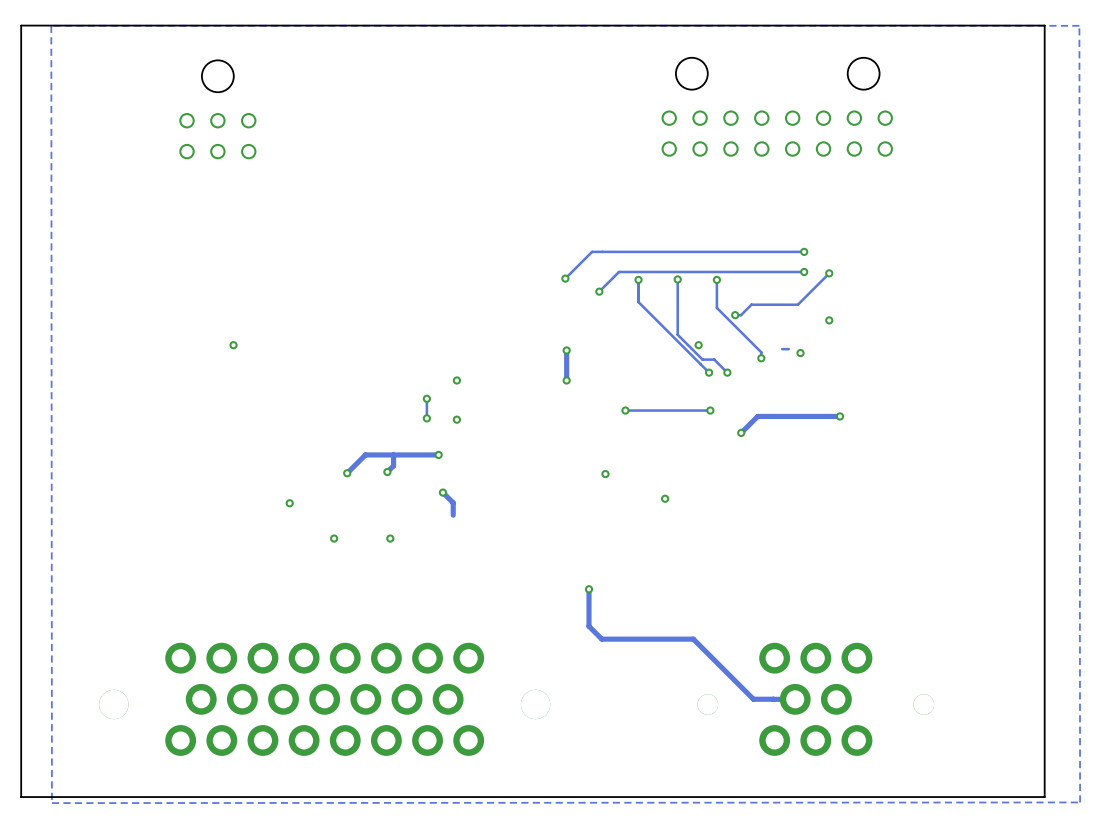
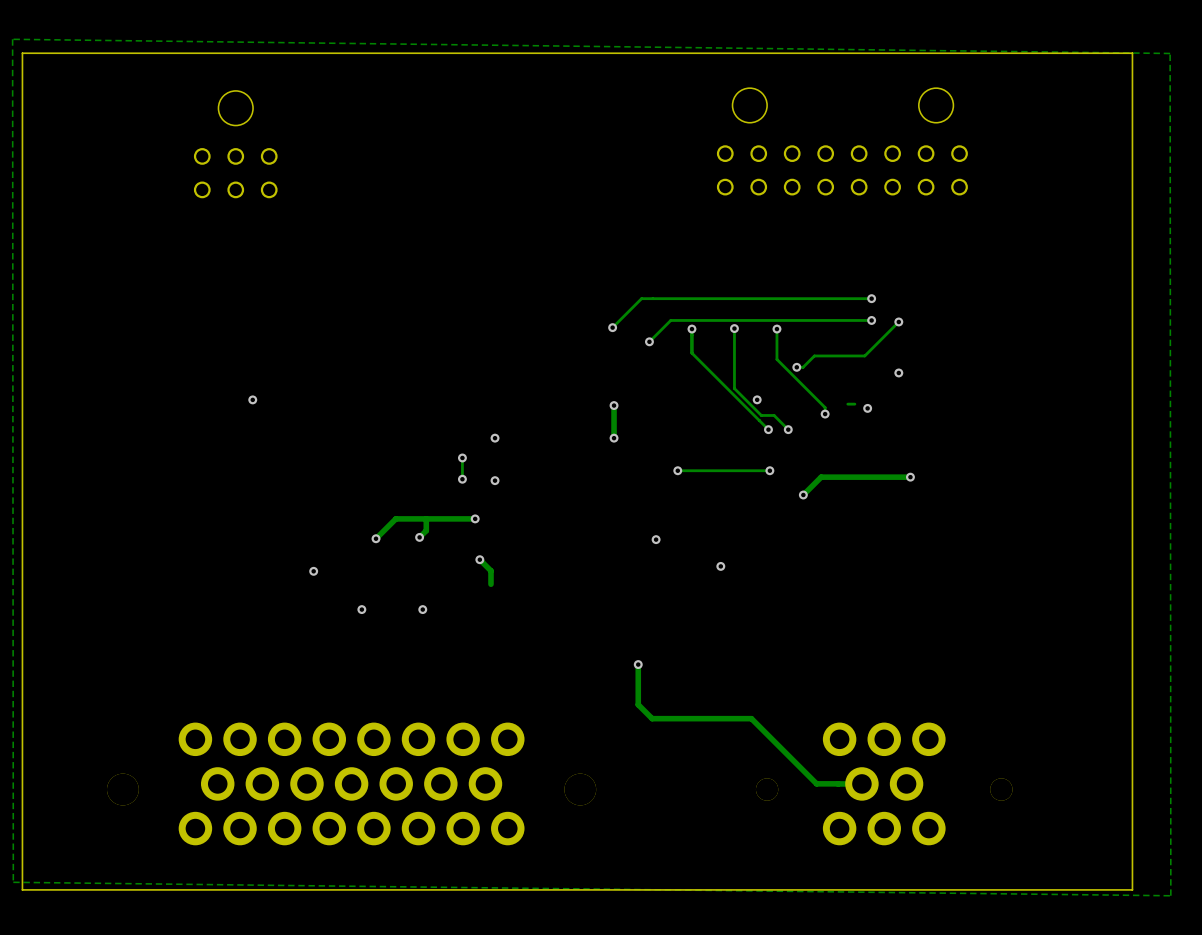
zone outline: (1079, 25) (51, 25) (51, 803) (1080, 802) -> (1170, 53) (12, 39) (13, 882) (1170, 895)

